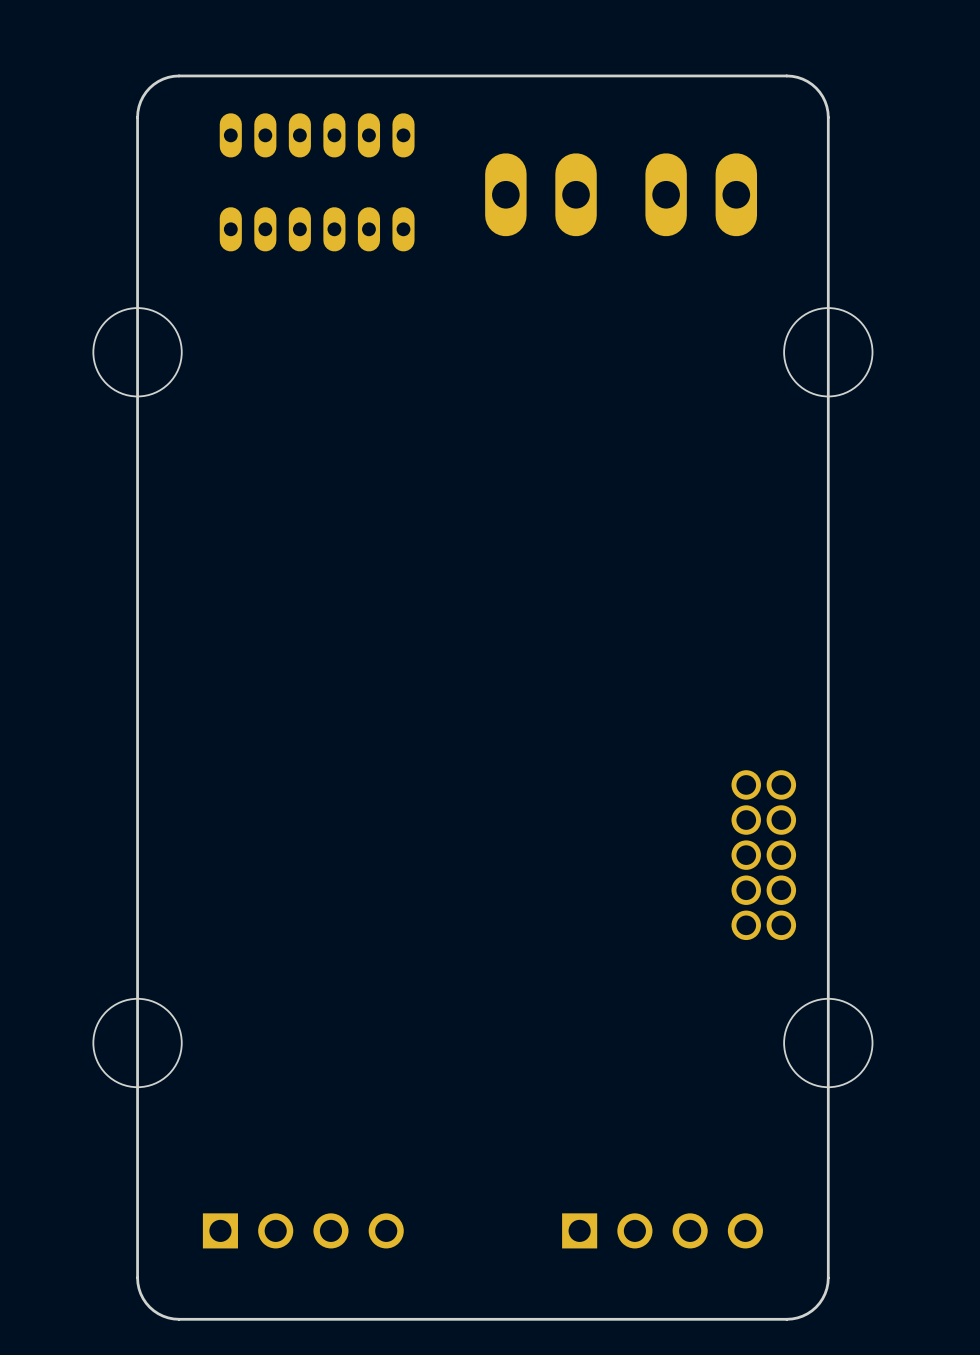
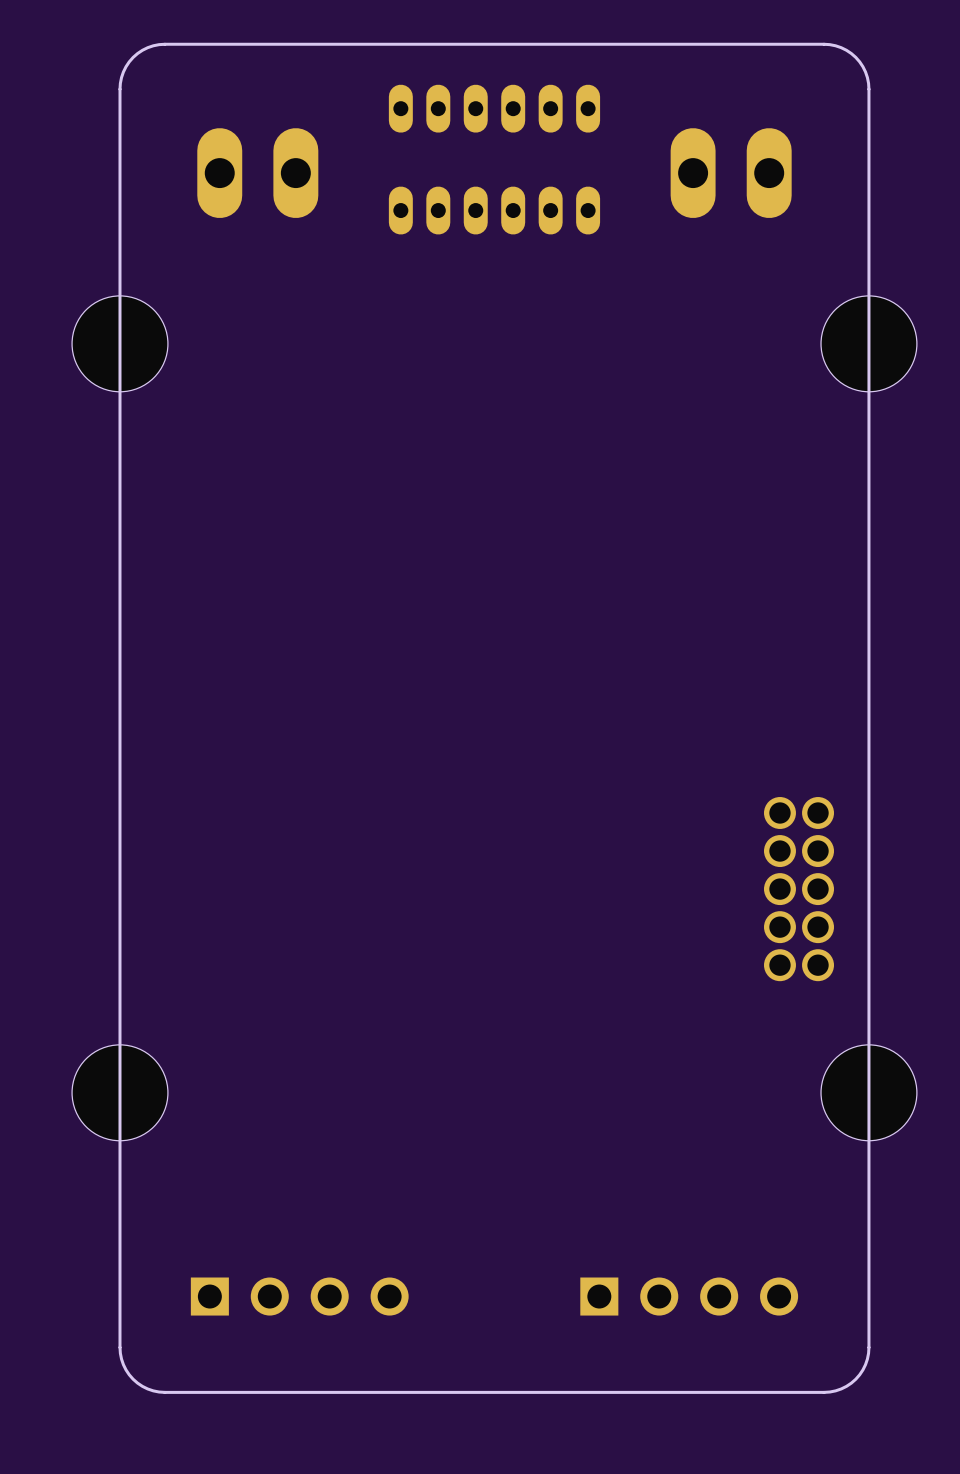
part: (317, 135) -> none
part: none -> (494, 108)
part position: (540, 194) -> (257, 173)
part: (317, 229) -> none
part: none -> (494, 210)

